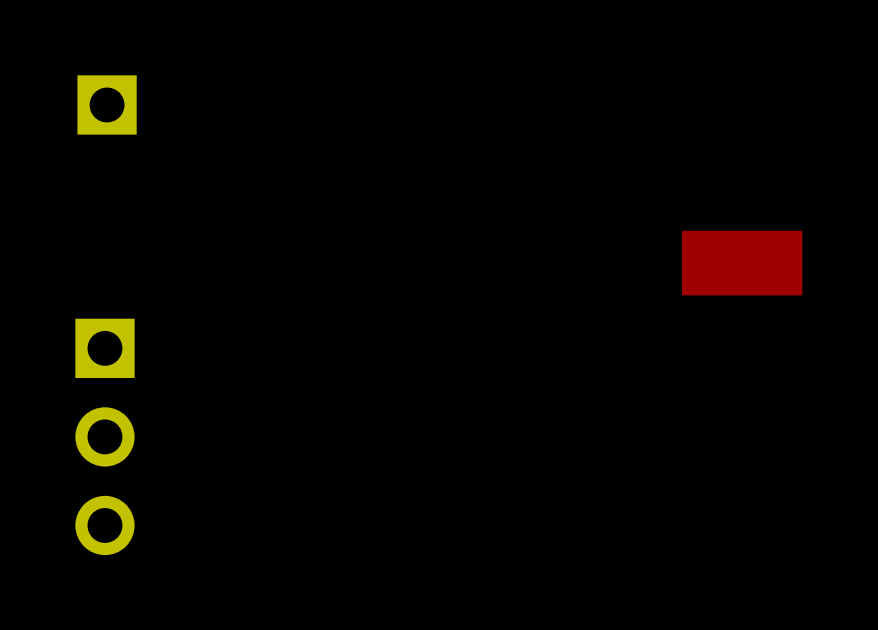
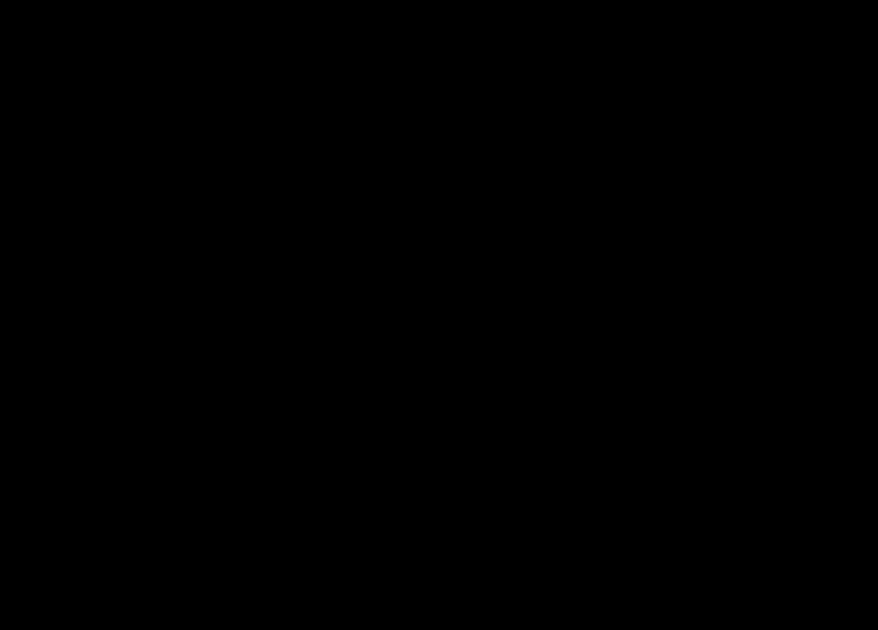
part: (107, 104) -> none
part: (742, 263) -> none
part: (104, 436) -> none

